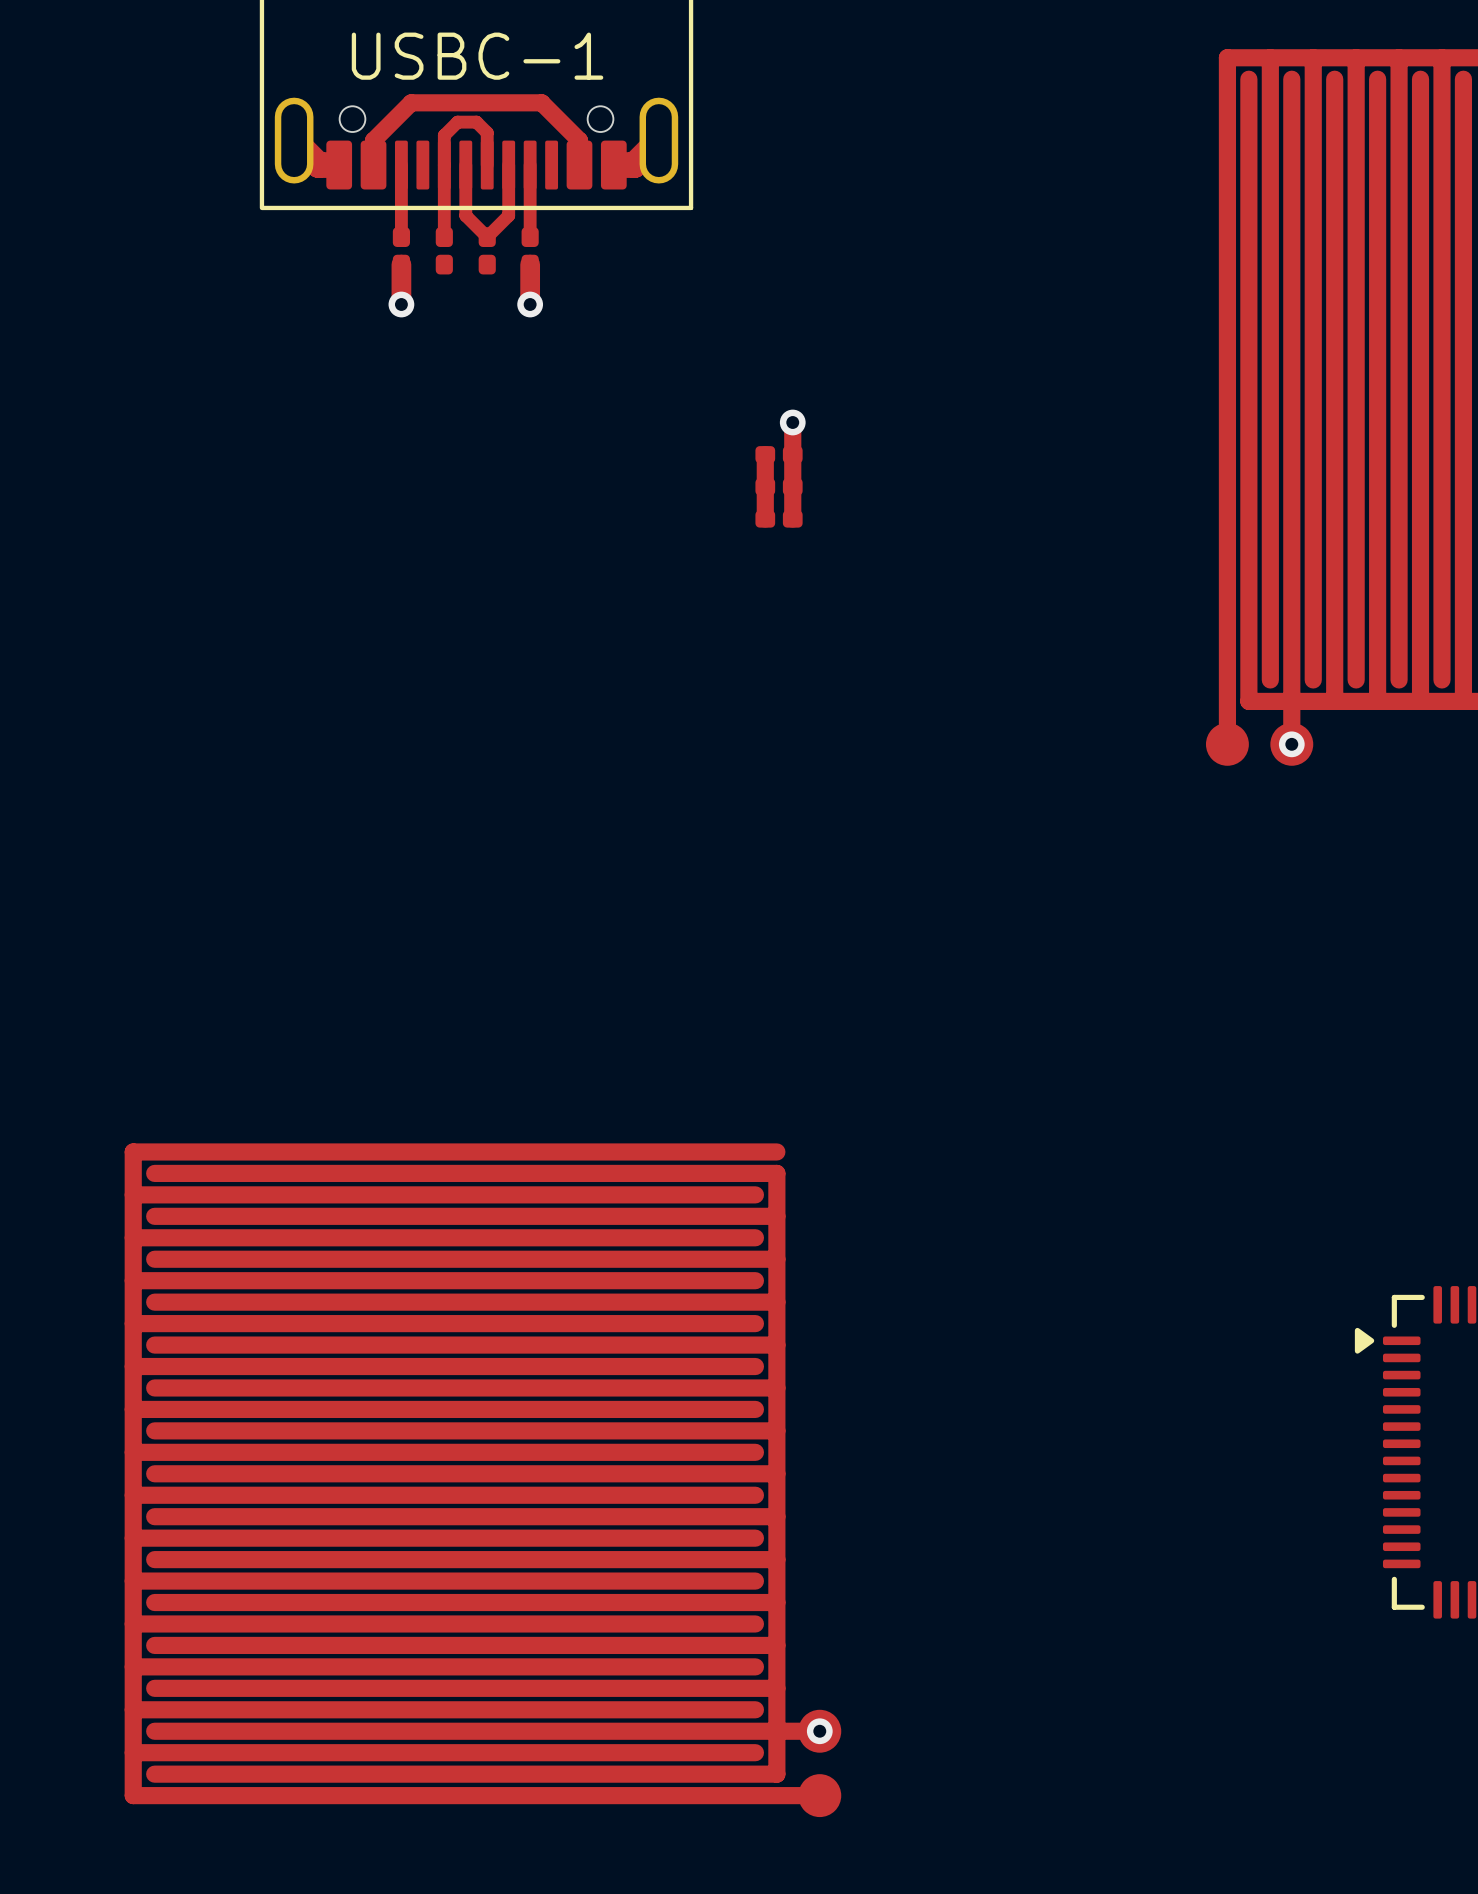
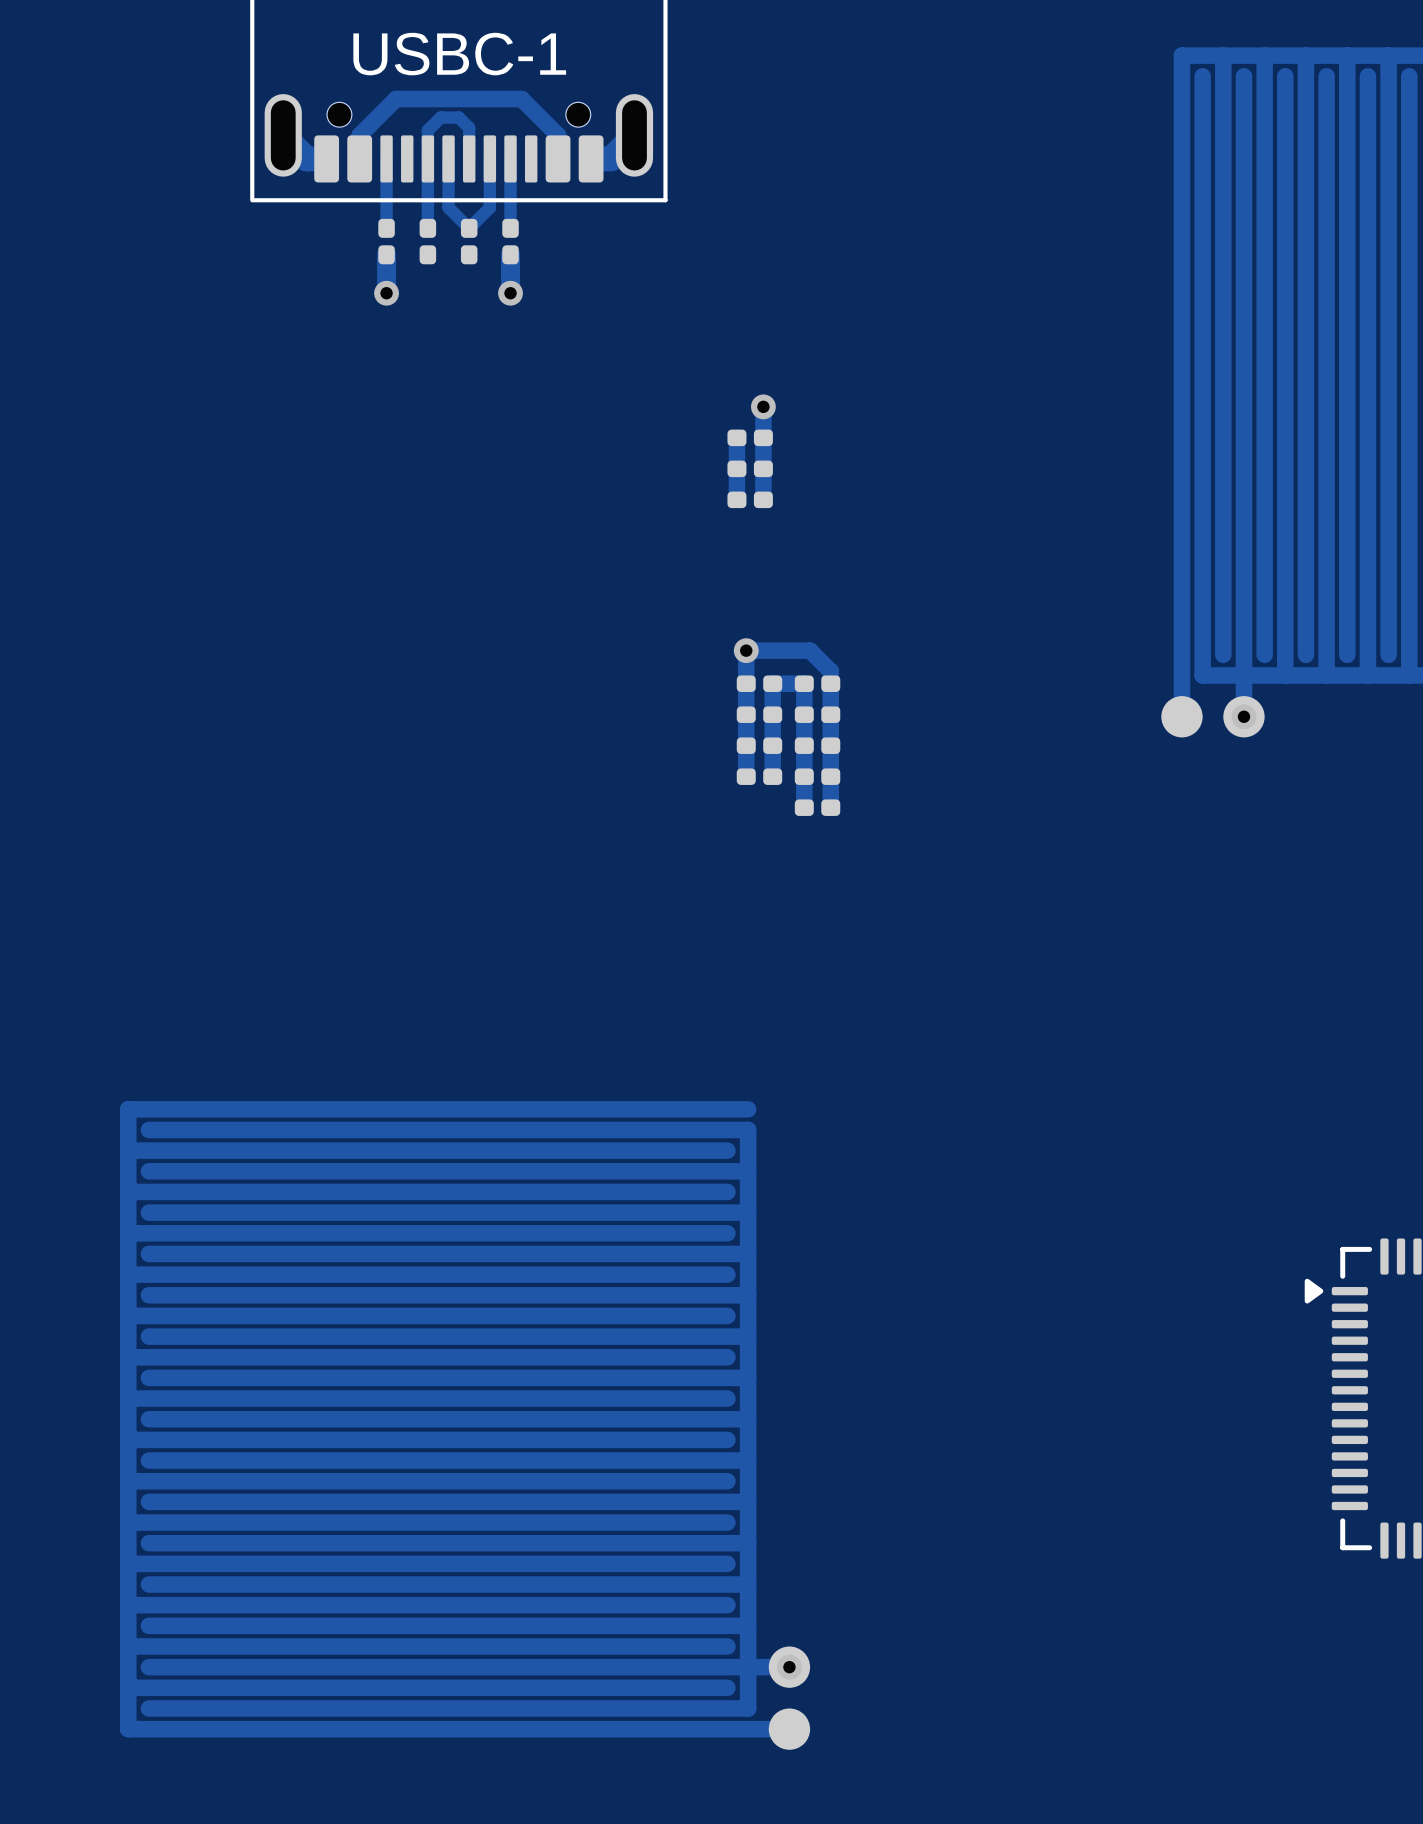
via: none -> (746, 650)
part: none -> (759, 683)
part: none -> (817, 683)
part: none -> (759, 714)
part: none -> (817, 714)
part: none -> (759, 745)
part: none -> (817, 745)
track: none -> (746, 776) (746, 650) (810, 650) (830, 671) (830, 807)
part: none -> (759, 776)
track: none -> (772, 776) (772, 683) (804, 683) (804, 807)
part: none -> (817, 776)
part: none -> (817, 807)

